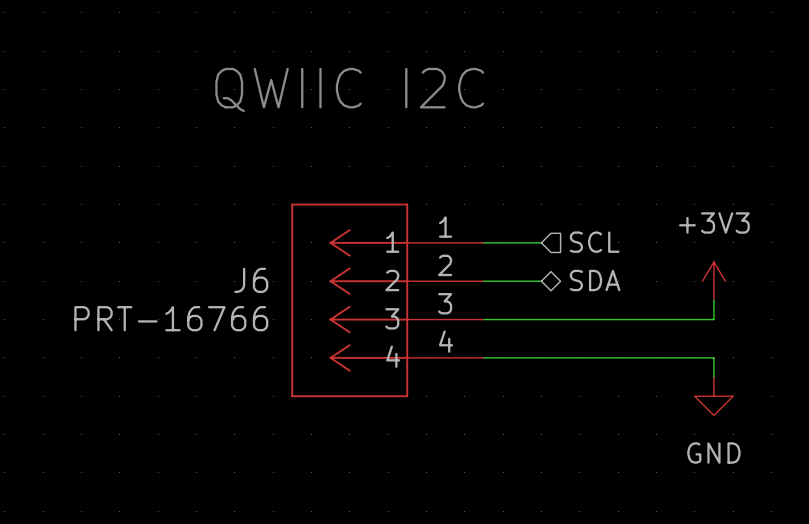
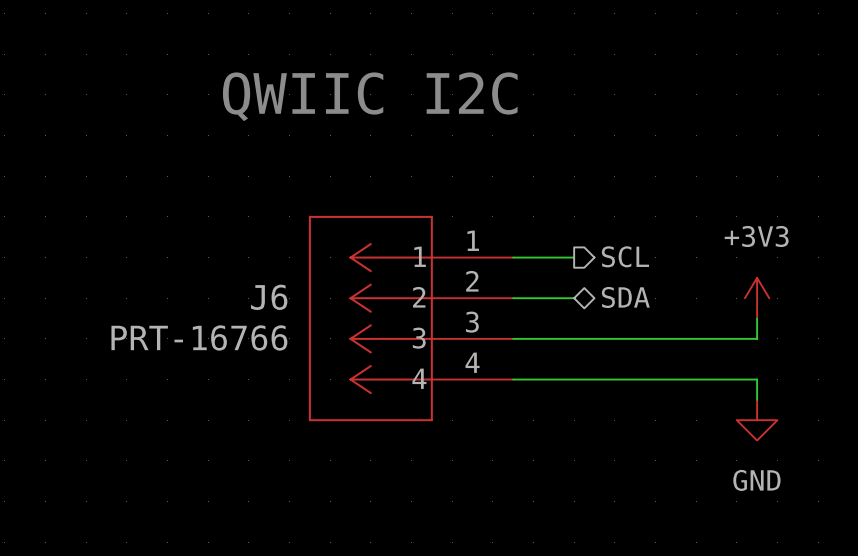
hierarchical label shape: input (594, 242) -> output (625, 256)

